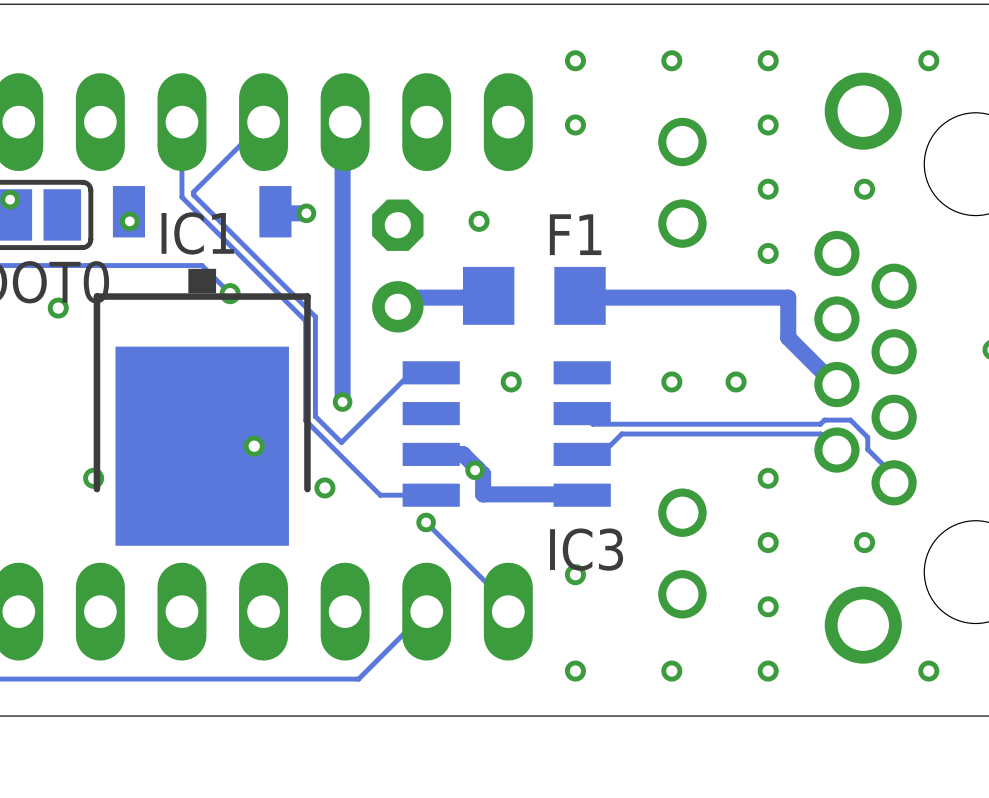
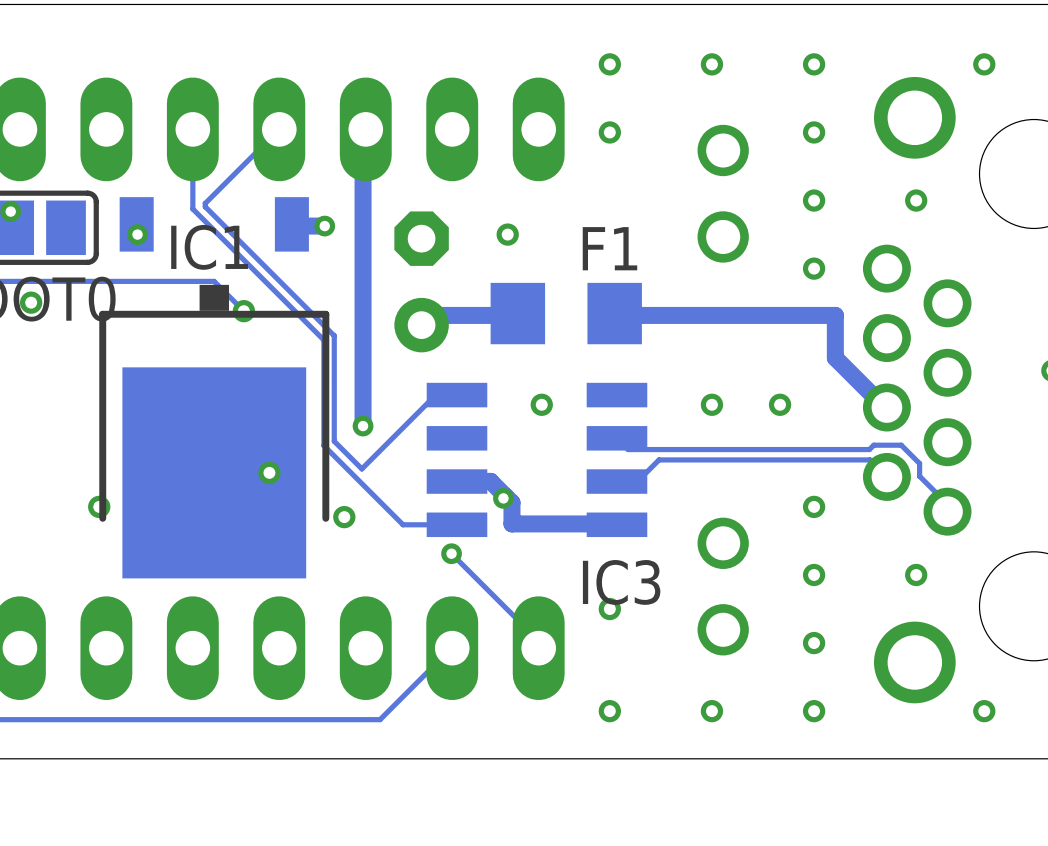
via position: (58, 308) -> (31, 302)

